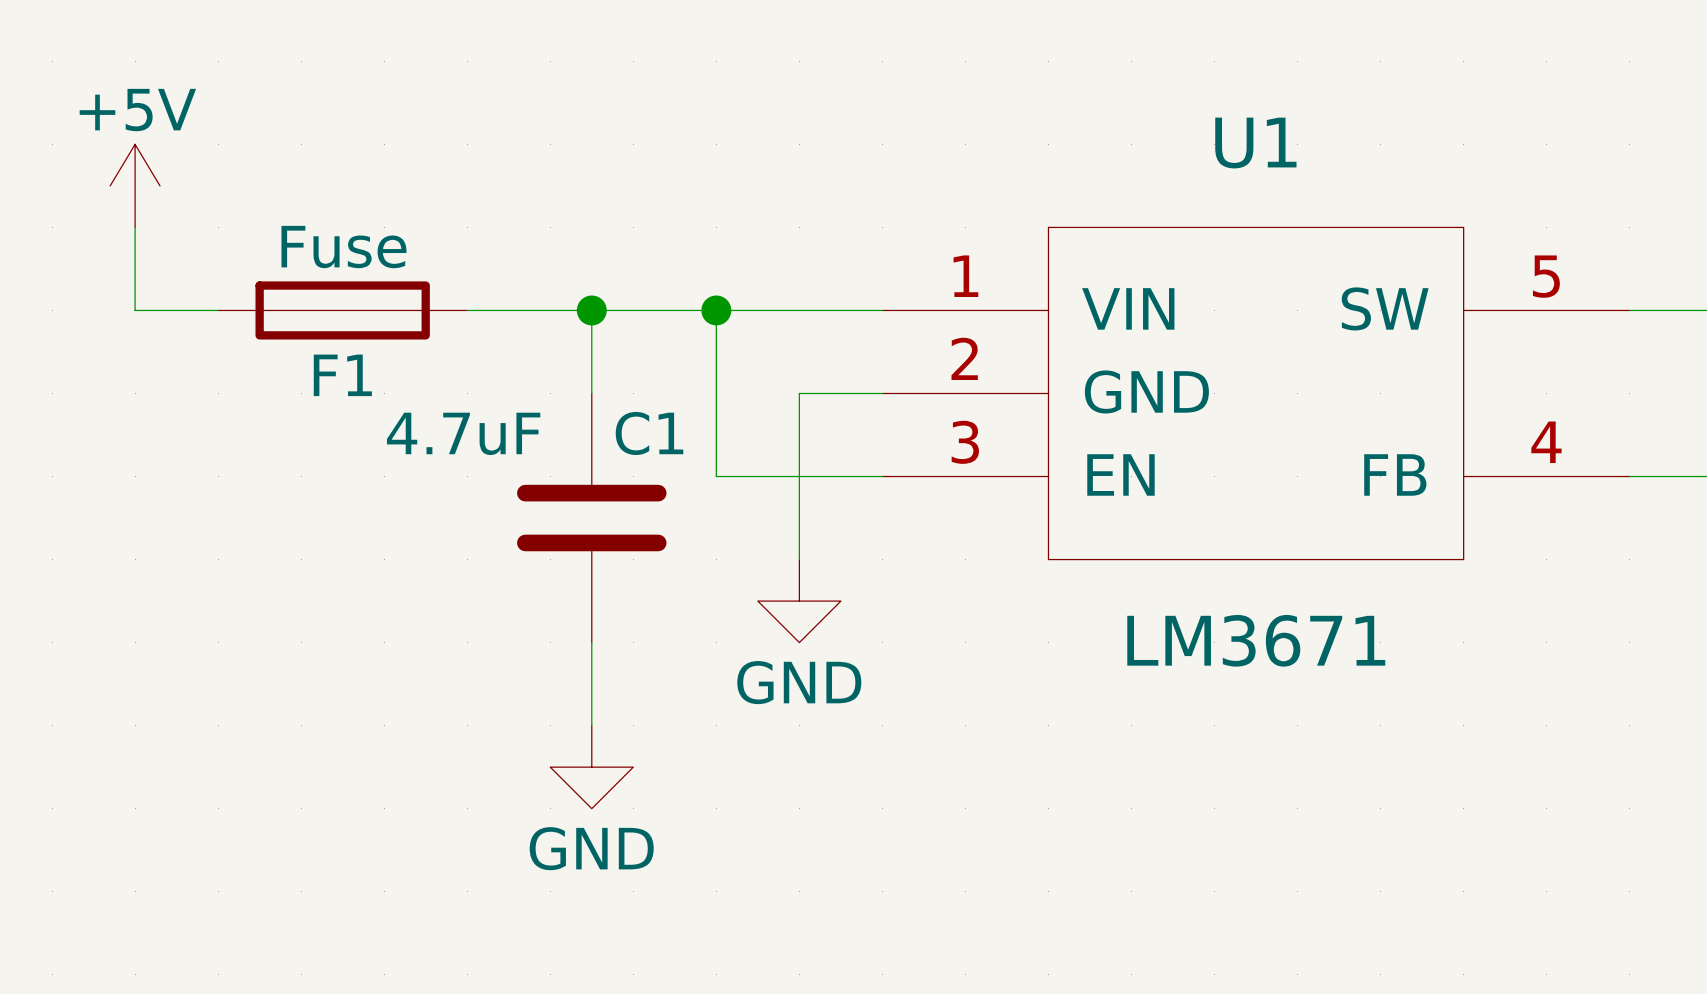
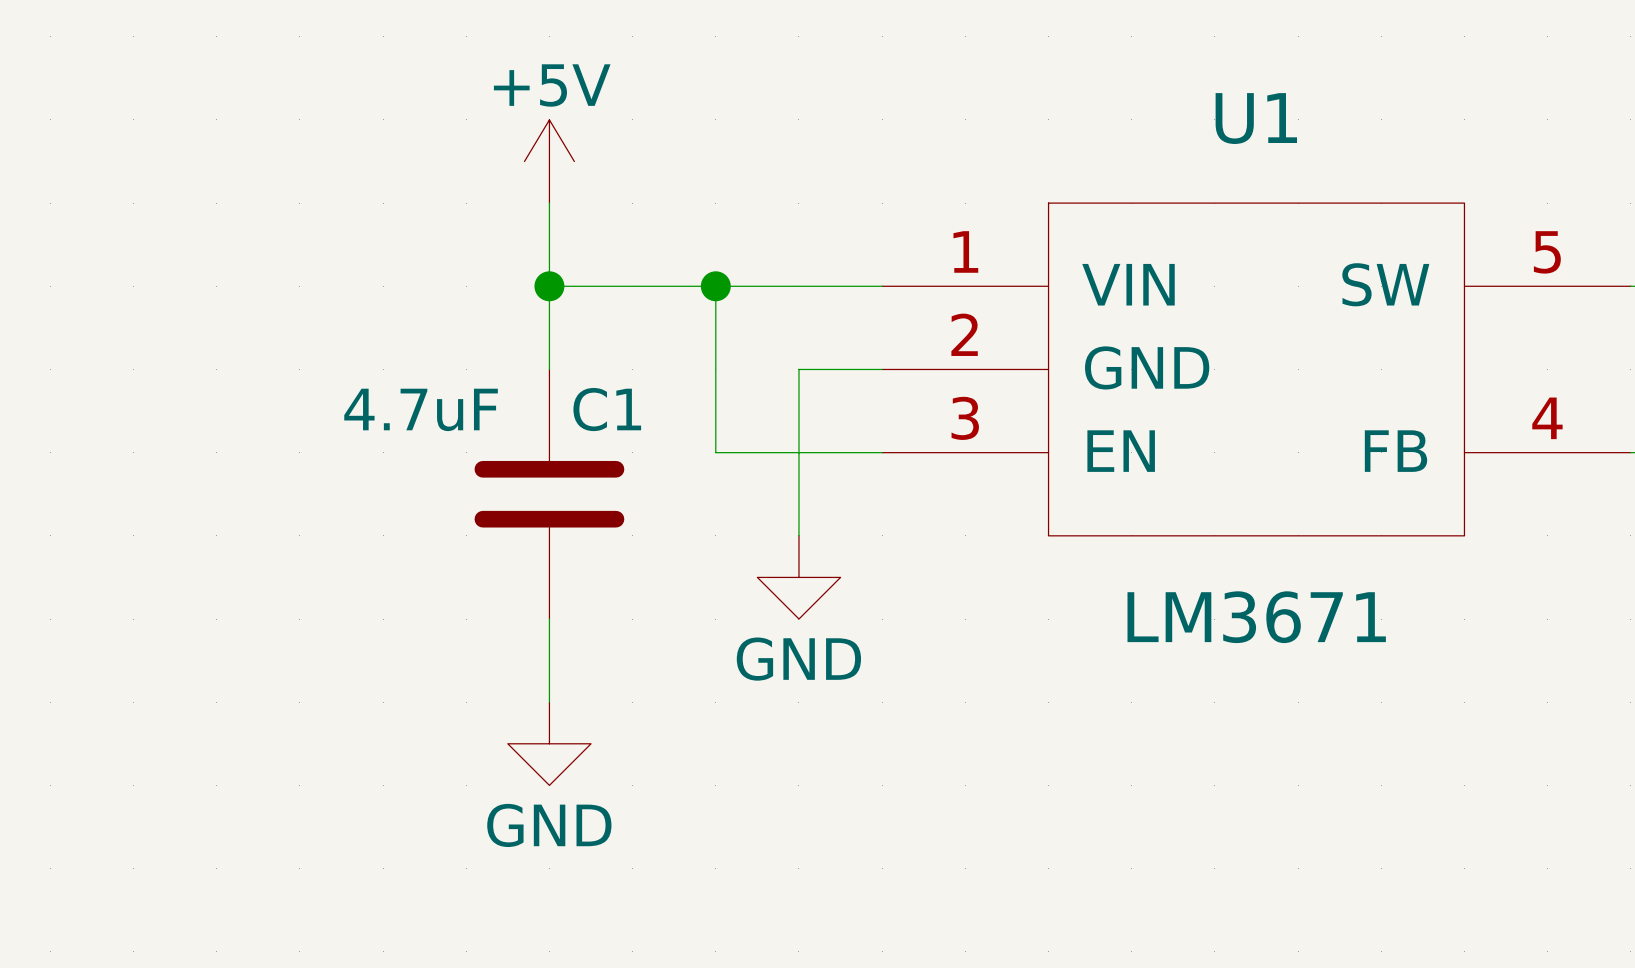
power symbol position: +5V (135, 185) -> +5V (549, 161)
wire: (135, 227) (135, 310) (218, 310) -> none
wire: none -> (549, 203) (549, 369)
F1: Fuse (342, 310) -> none
wire: (467, 310) (550, 310) -> none
wire: (591, 310) (591, 393) -> none
junction position: (591, 310) -> (549, 286)
C1 position: (591, 518) -> (549, 494)
wire: (591, 642) (591, 725) -> (549, 619) (549, 702)
power symbol position: GND (591, 767) -> GND (549, 743)

